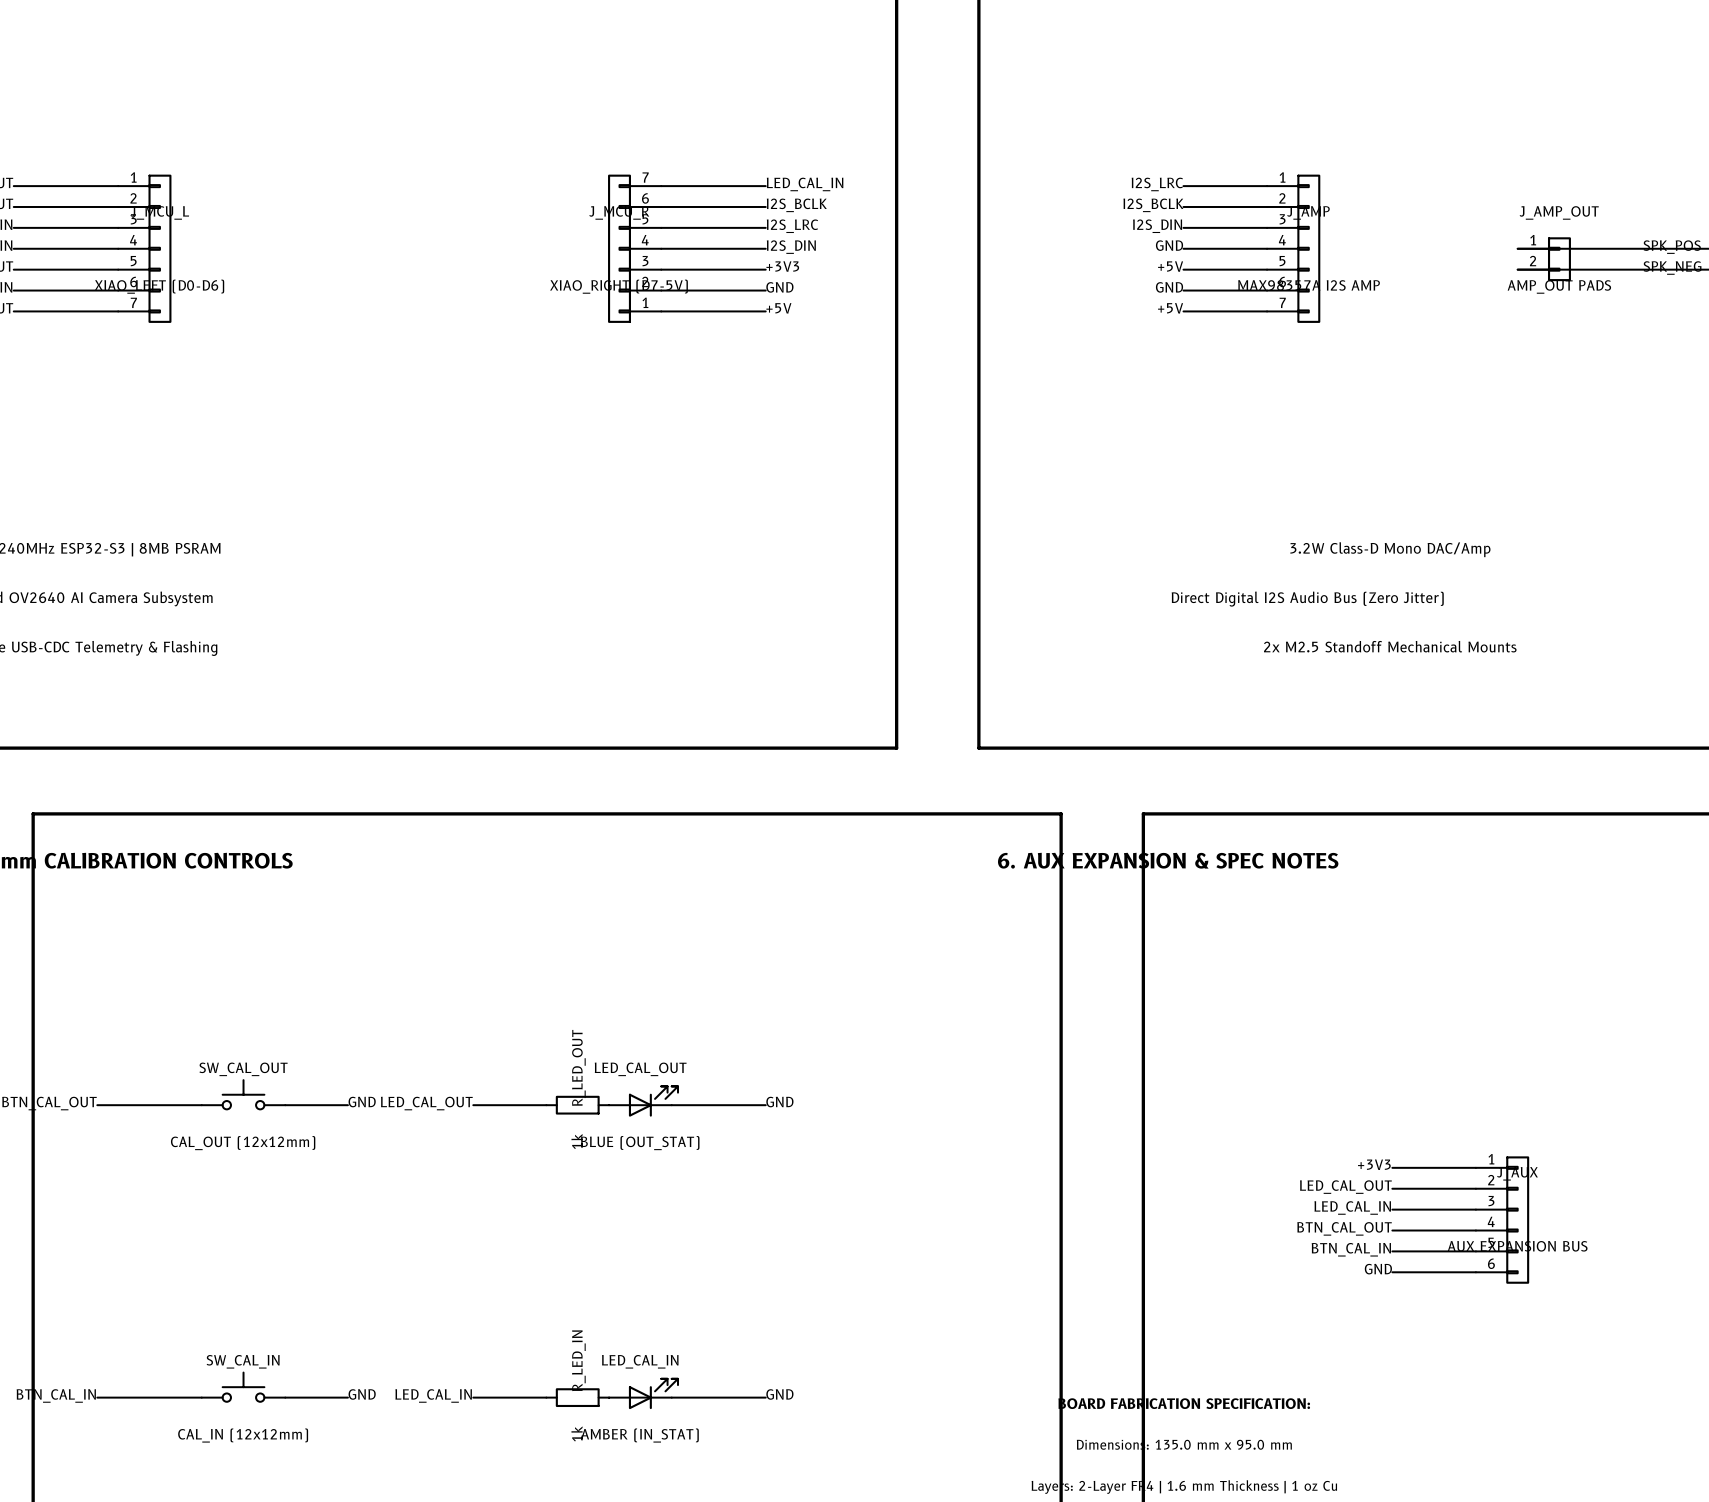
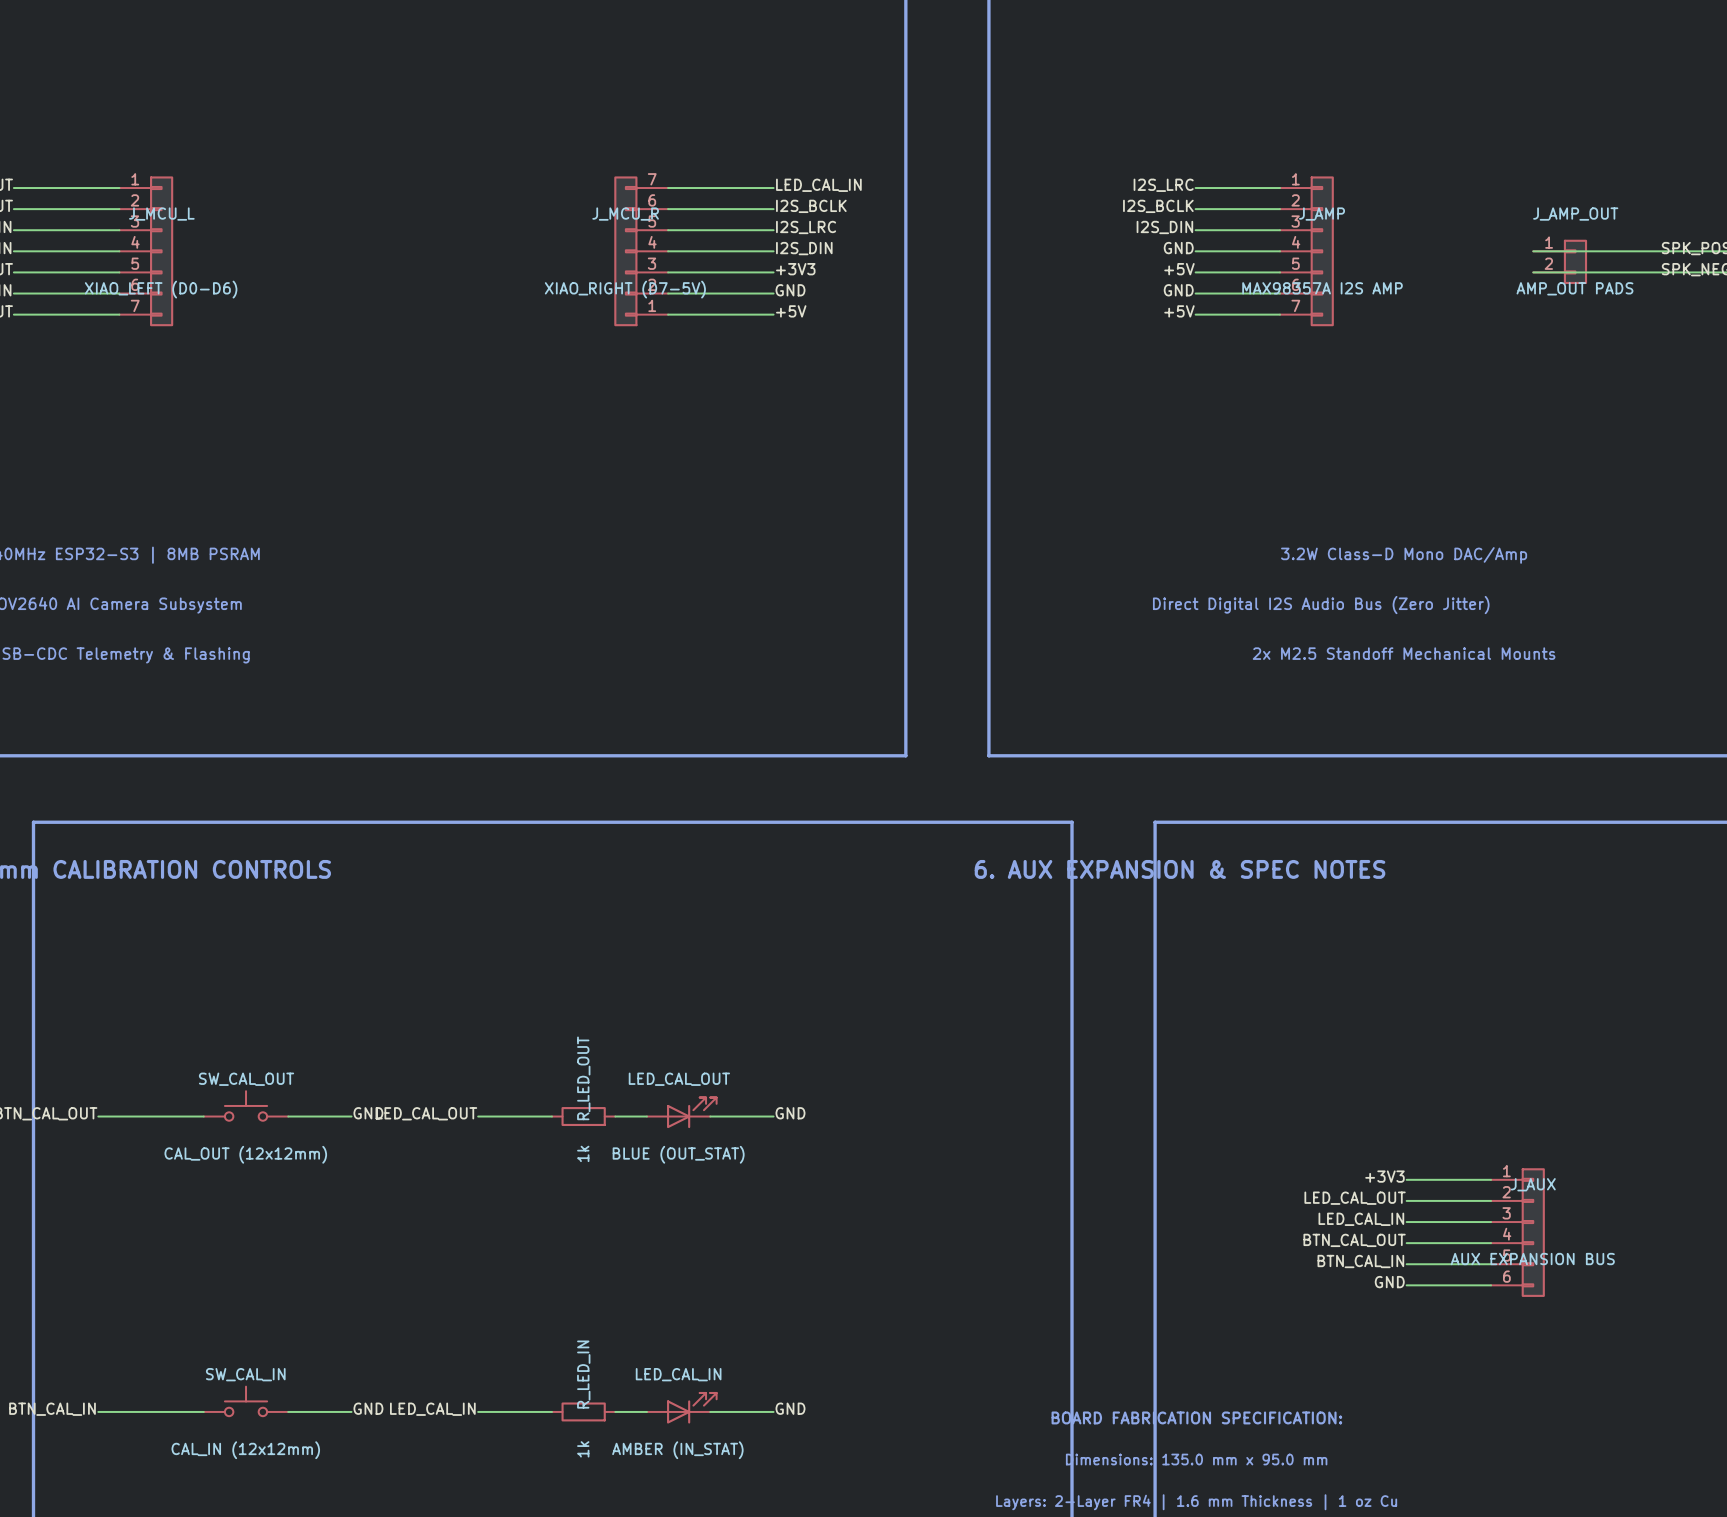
LED_CAL_OUT position: (643, 1101) -> (681, 1112)
LED_CAL_IN position: (643, 1393) -> (681, 1408)

